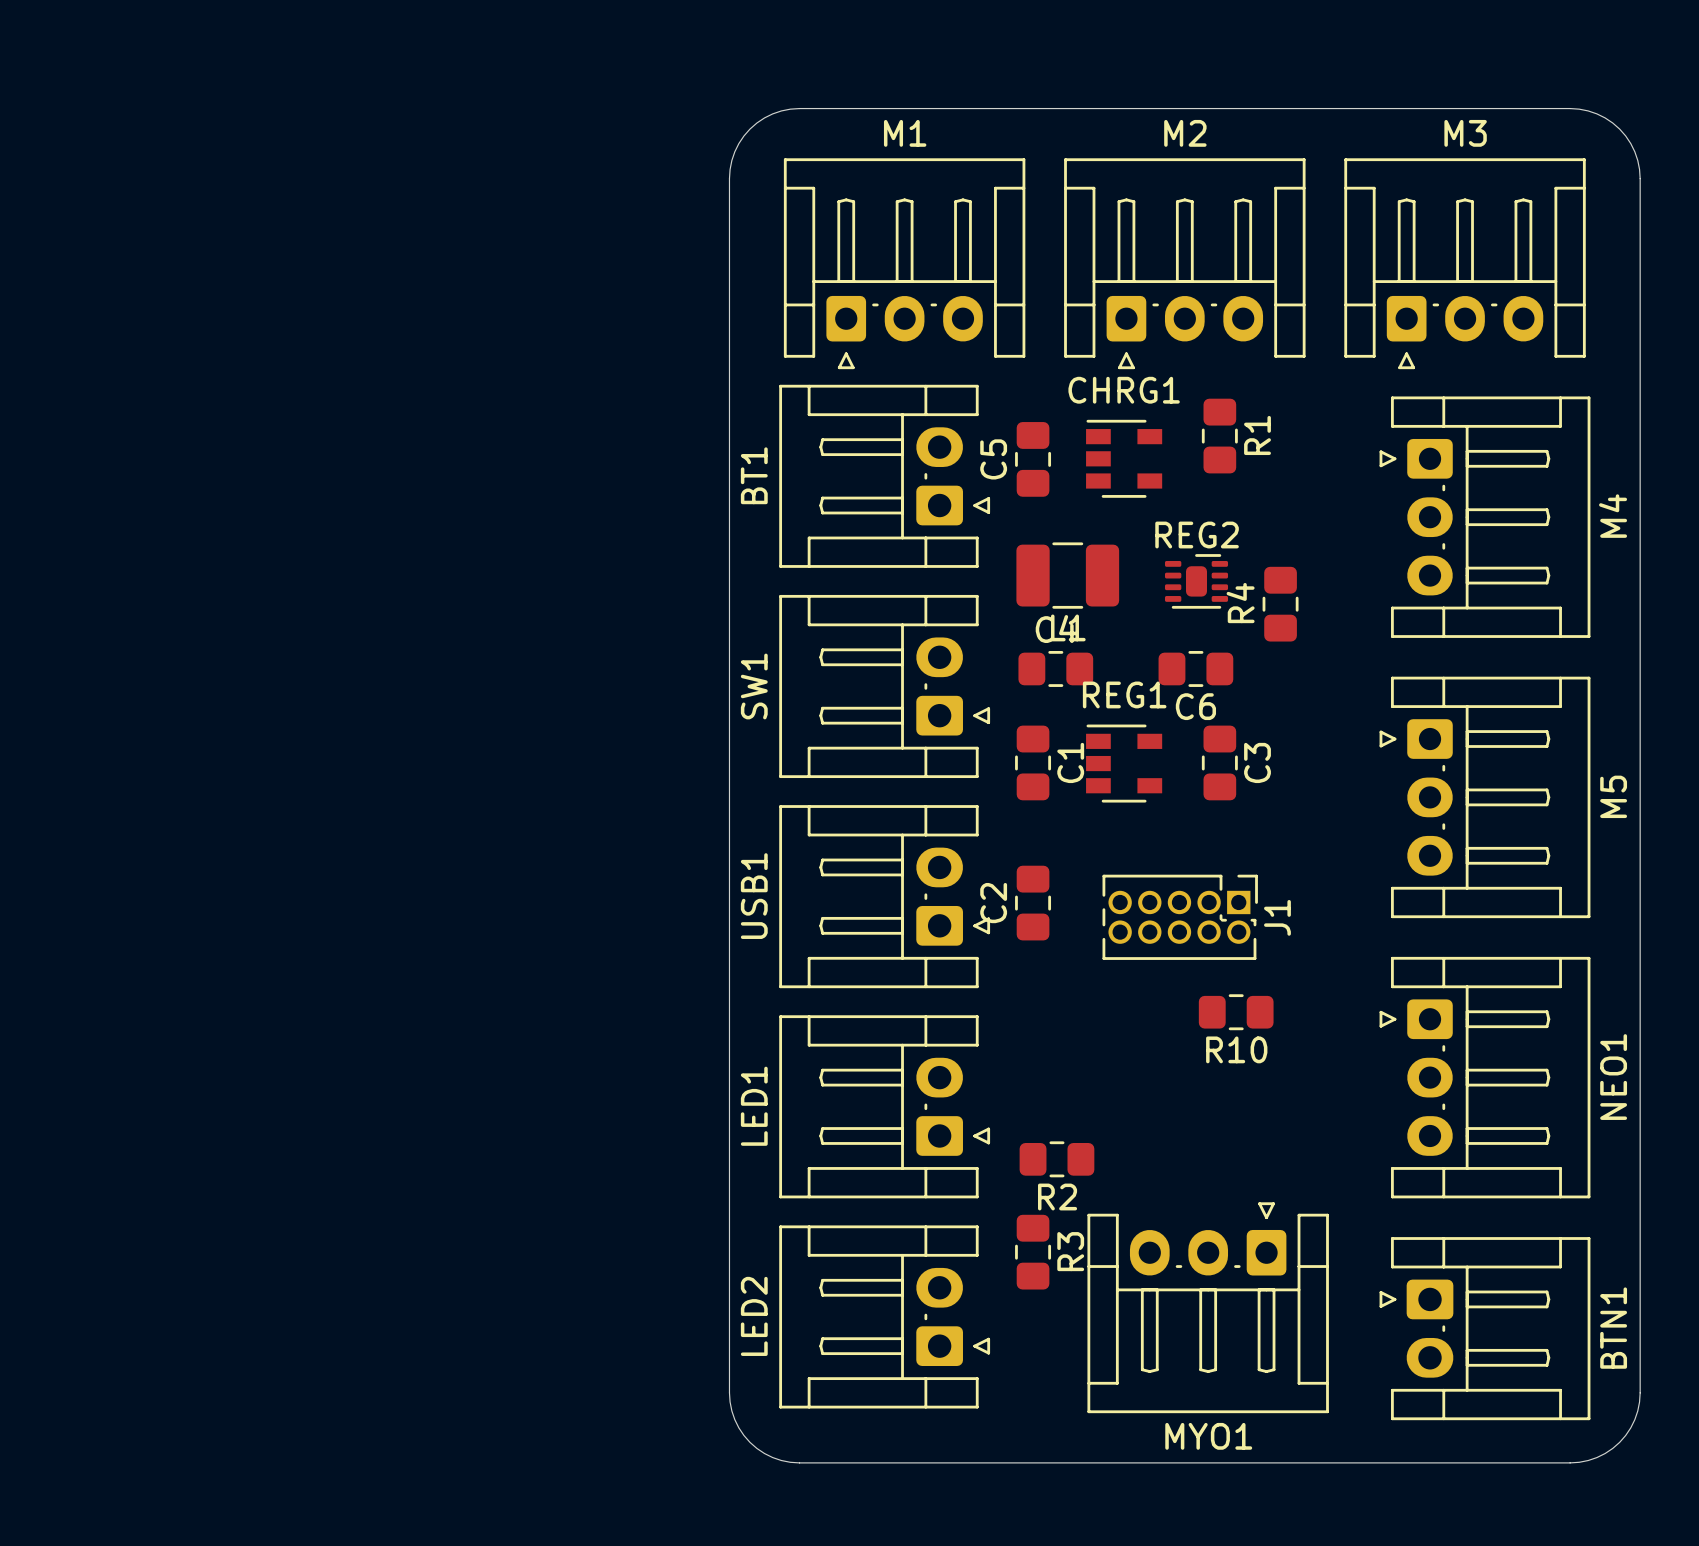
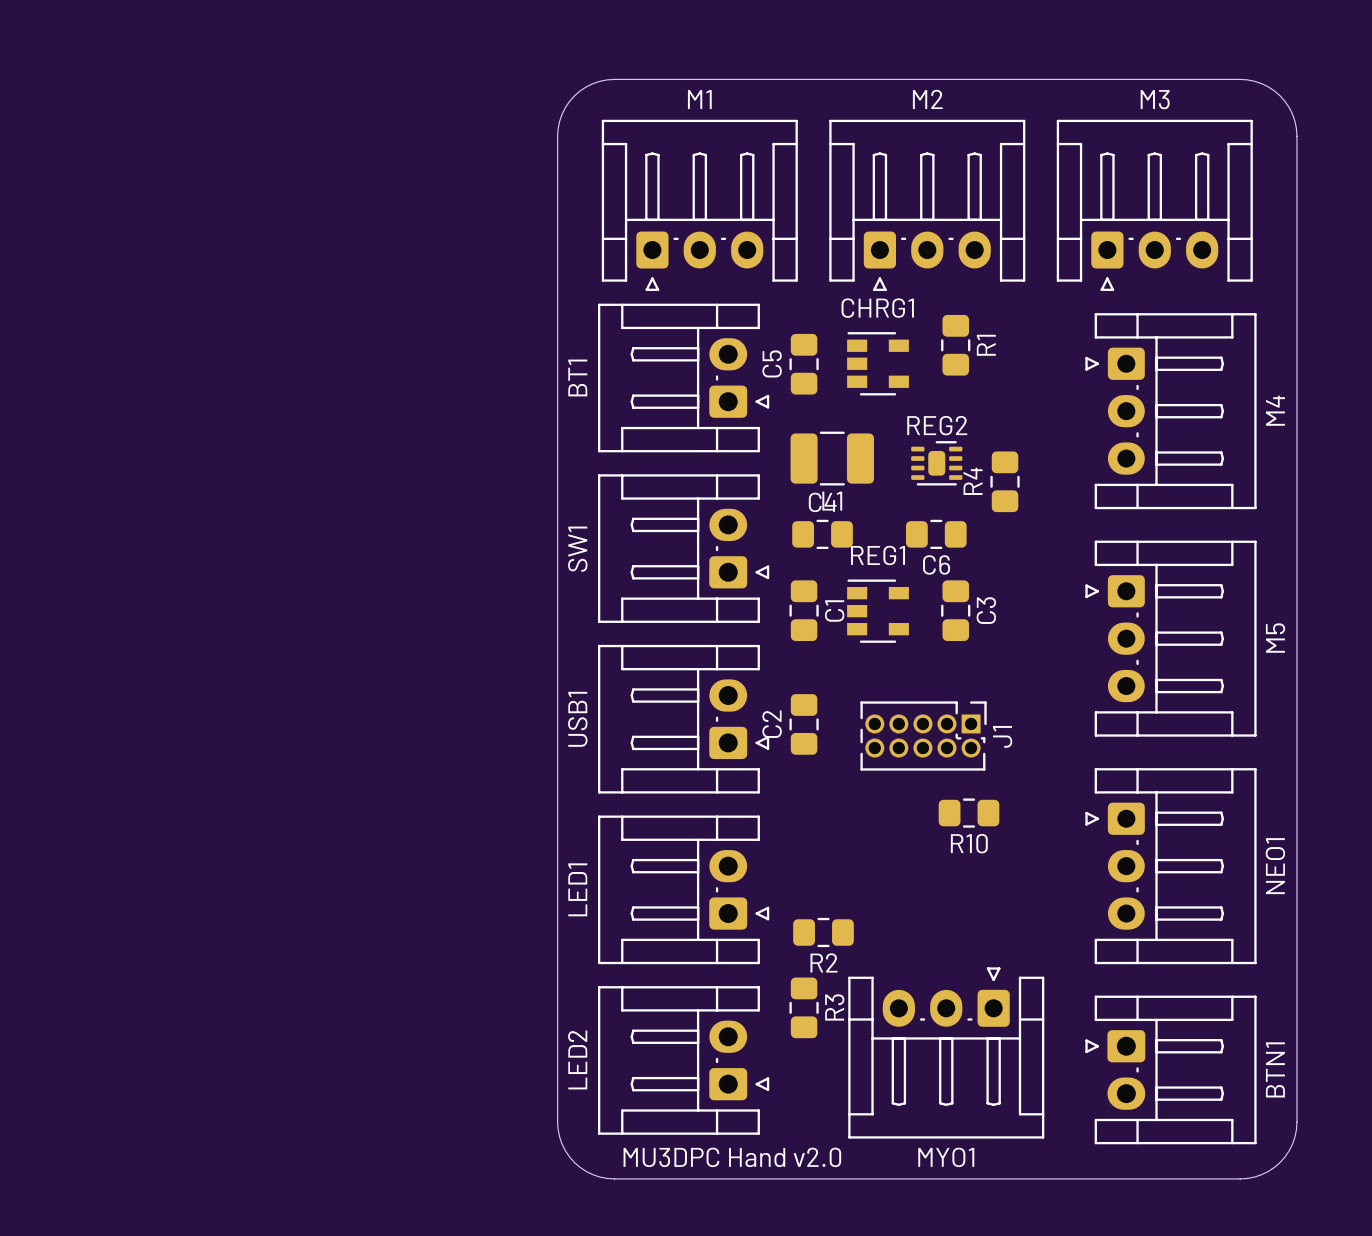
text: none -> MU3DPC Hand v2.0 (732, 1157)

